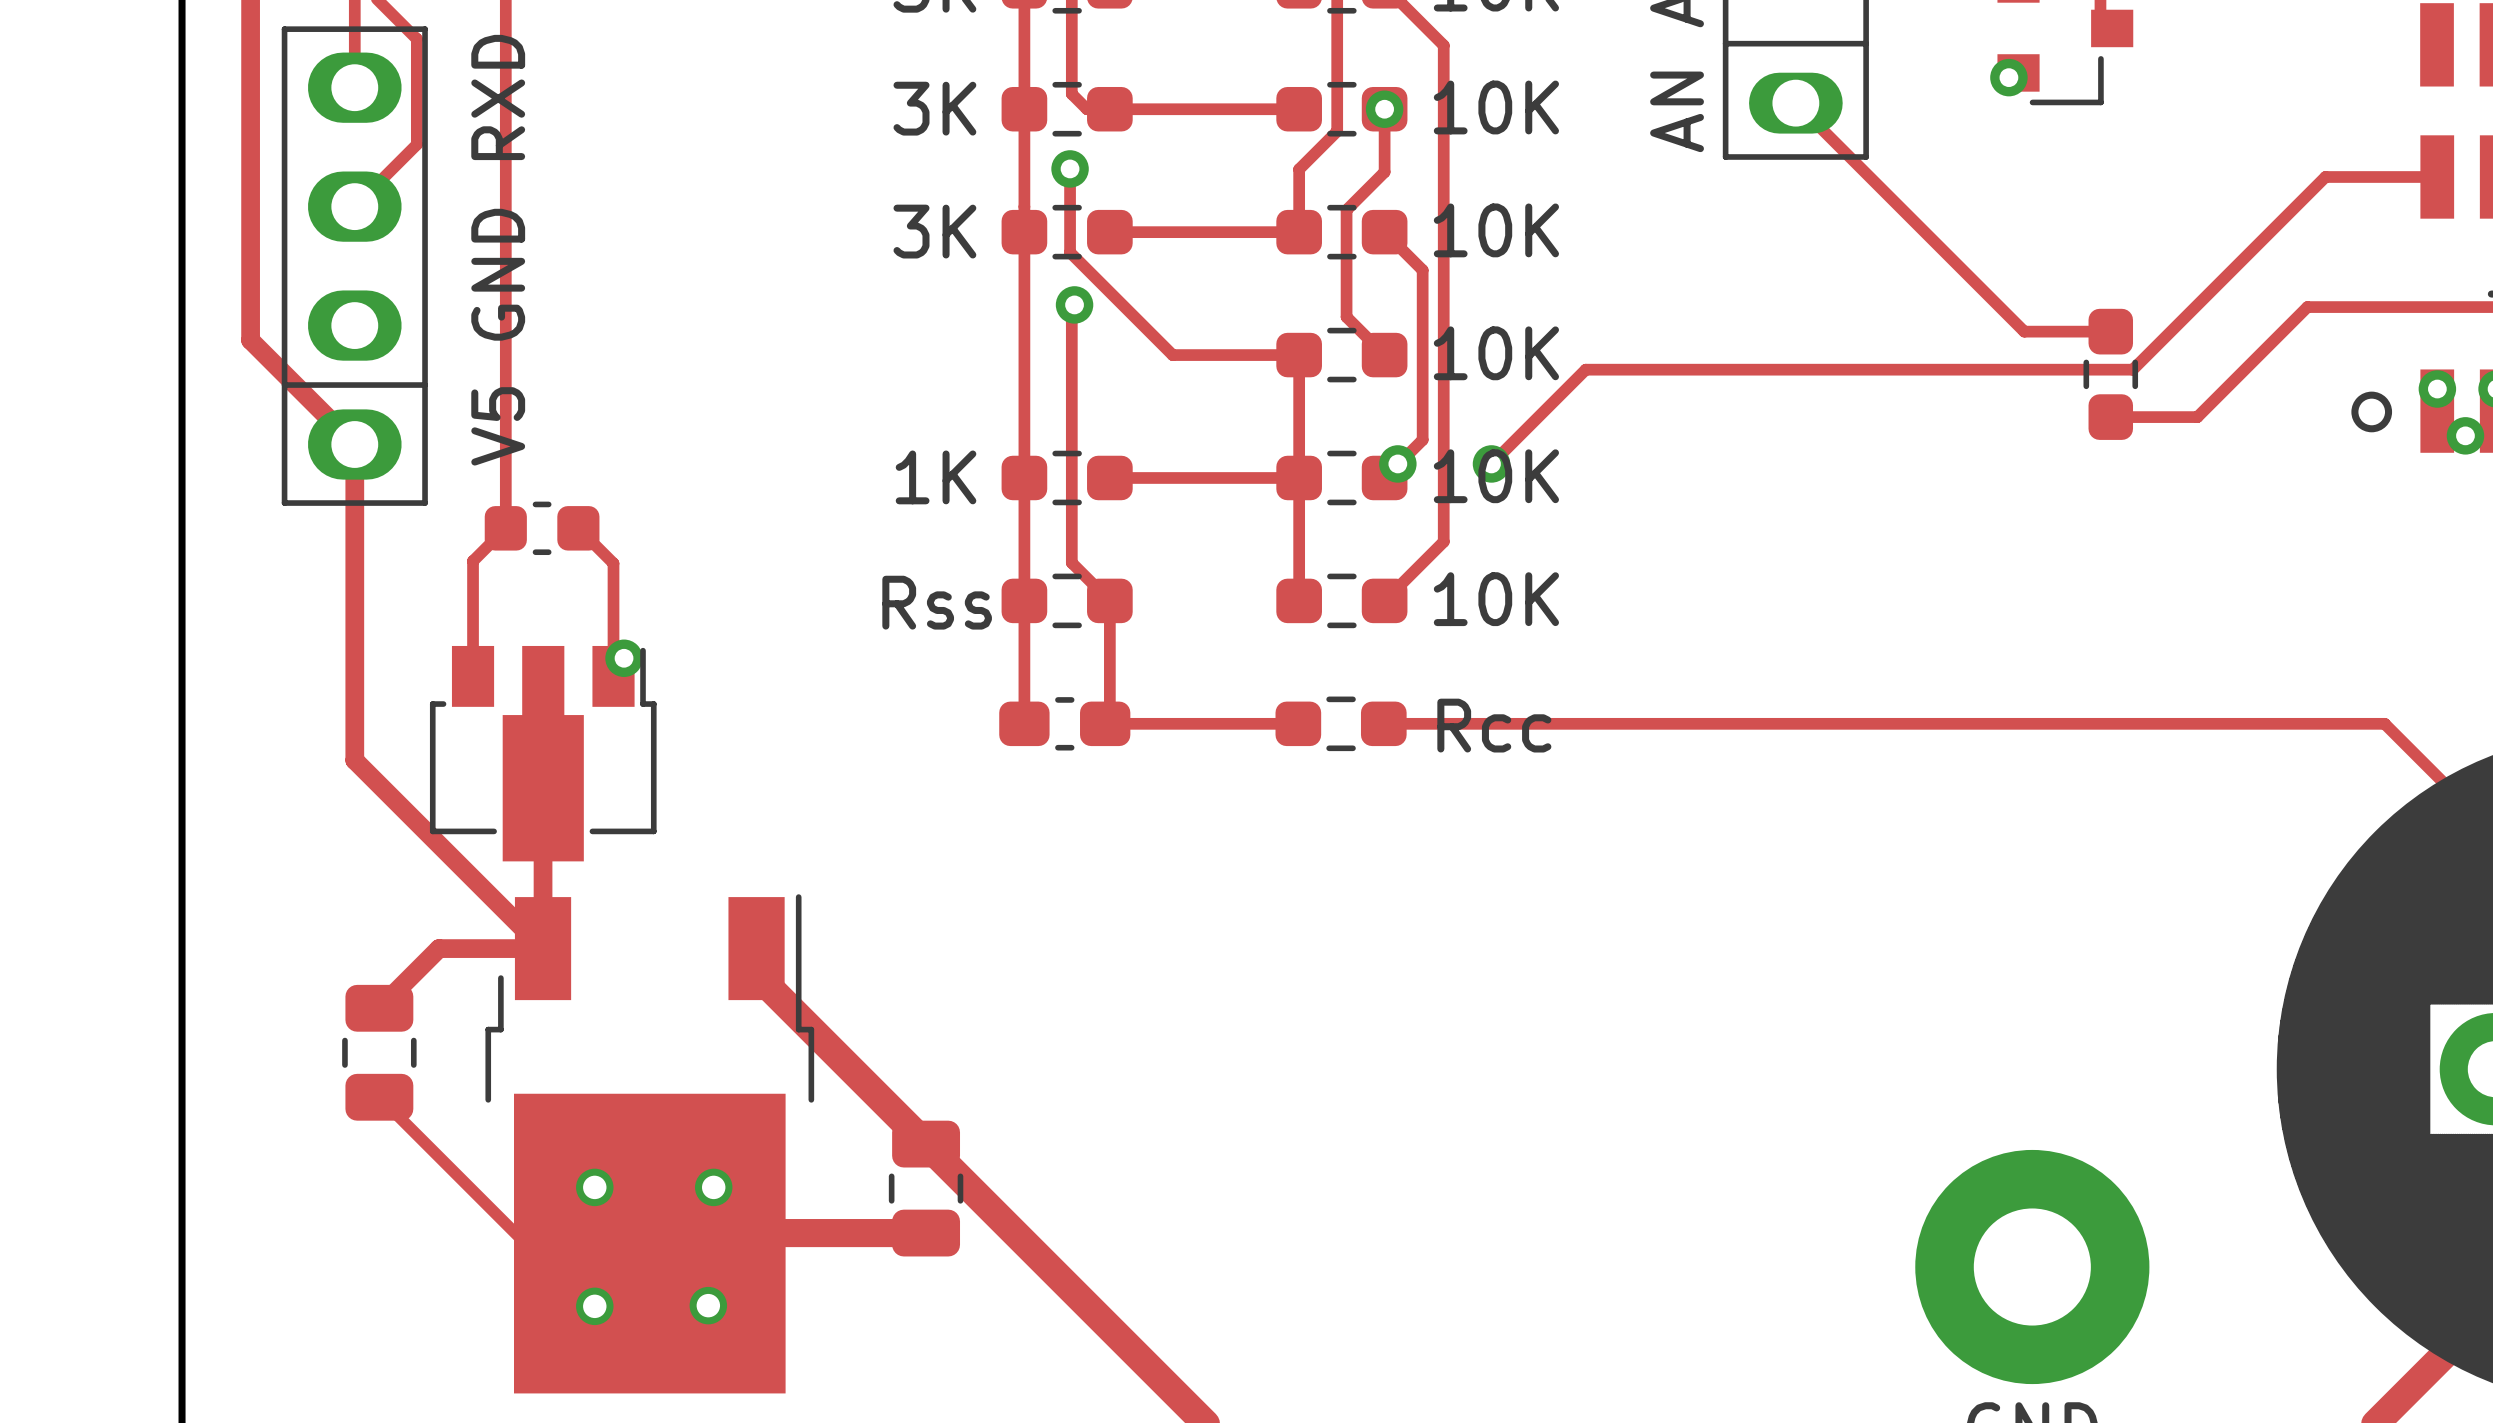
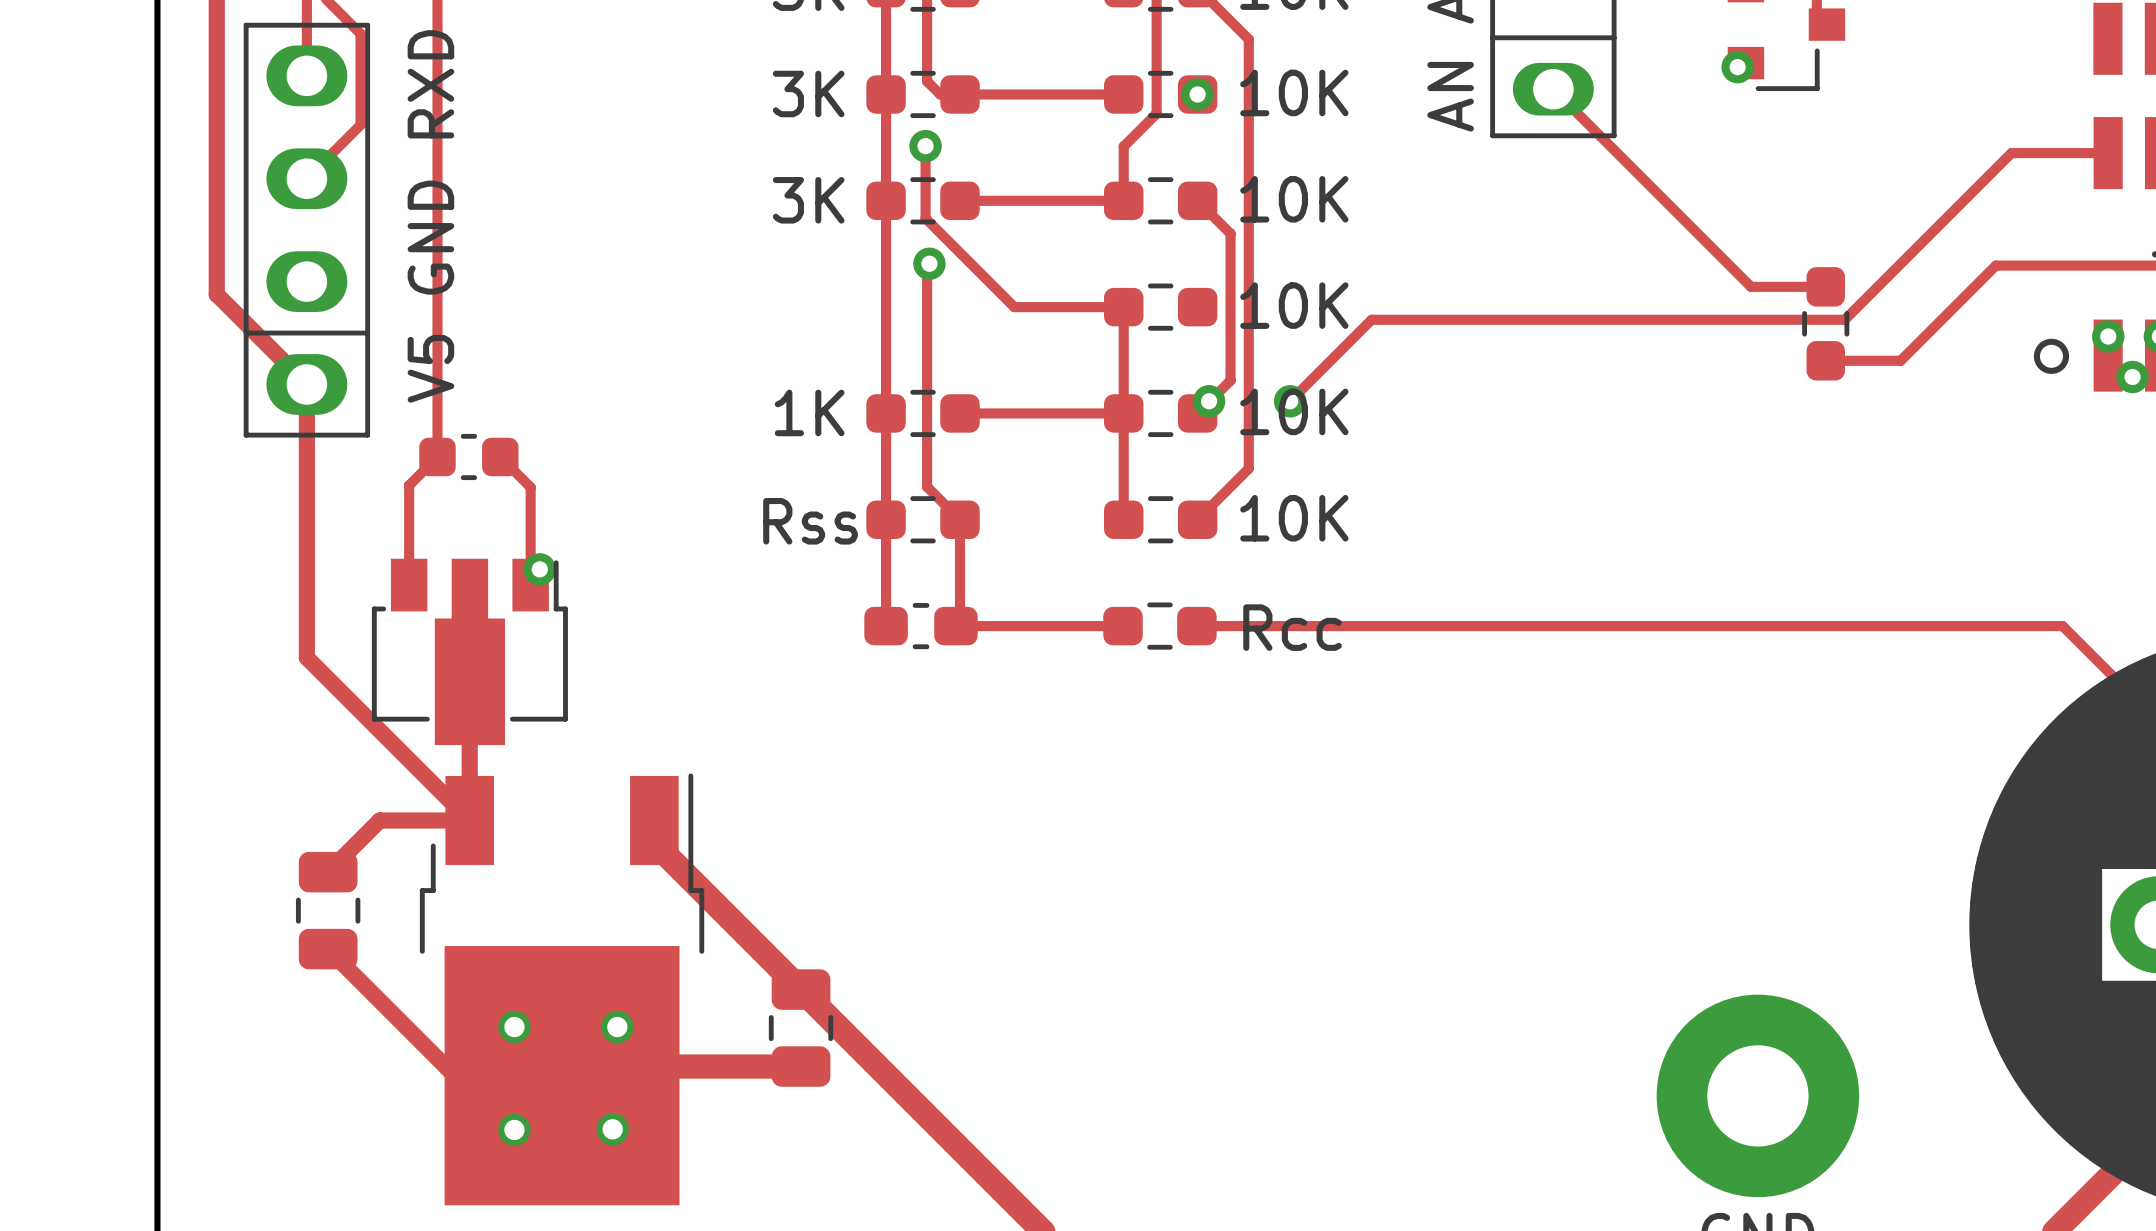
track: (1384, 109) (1384, 172) (1346, 210) (1346, 317) (1384, 355) -> none
track width: thin (379, 1097) (525, 1243) -> thick (328, 949) (454, 1075)

